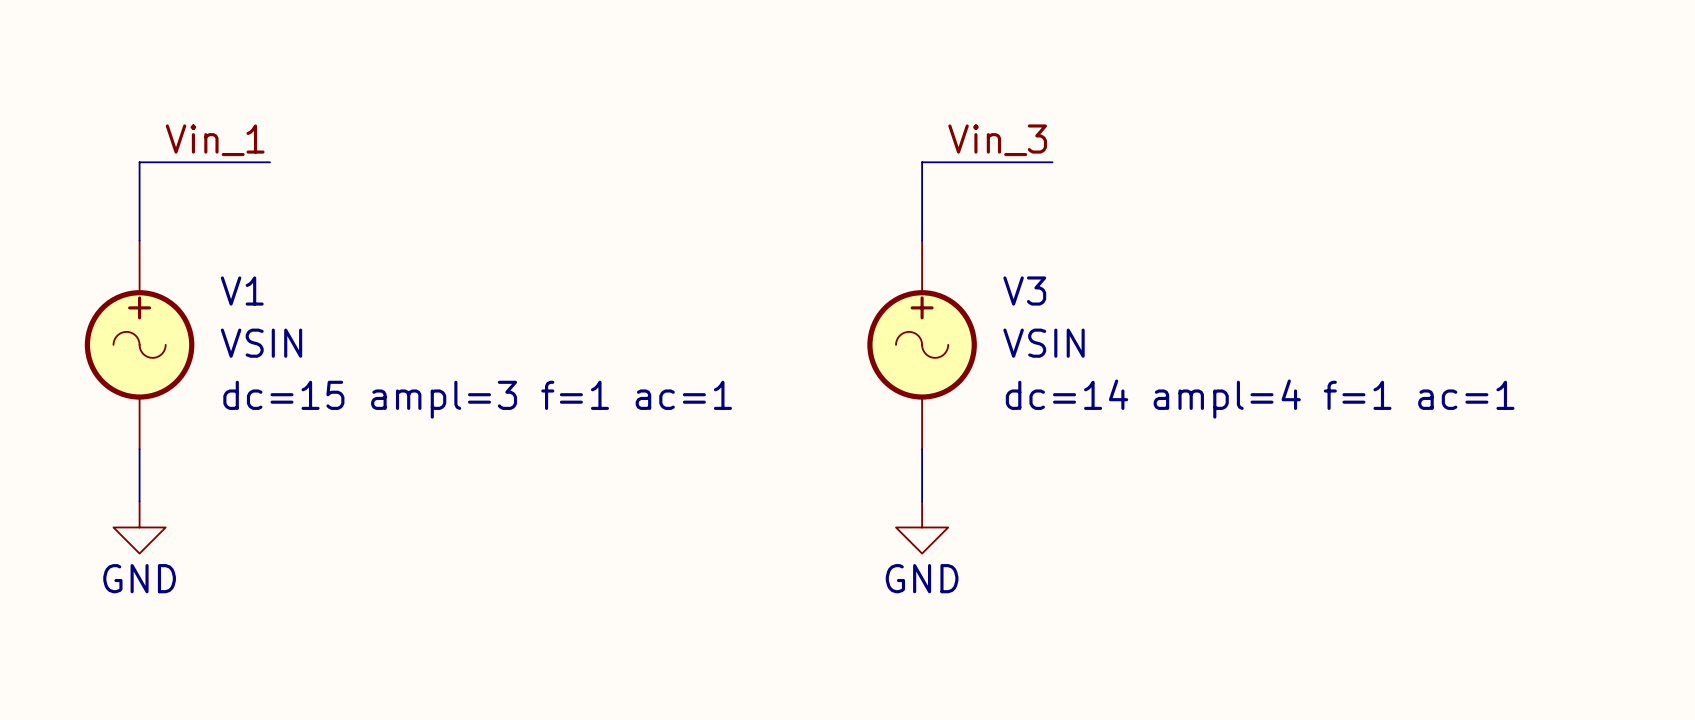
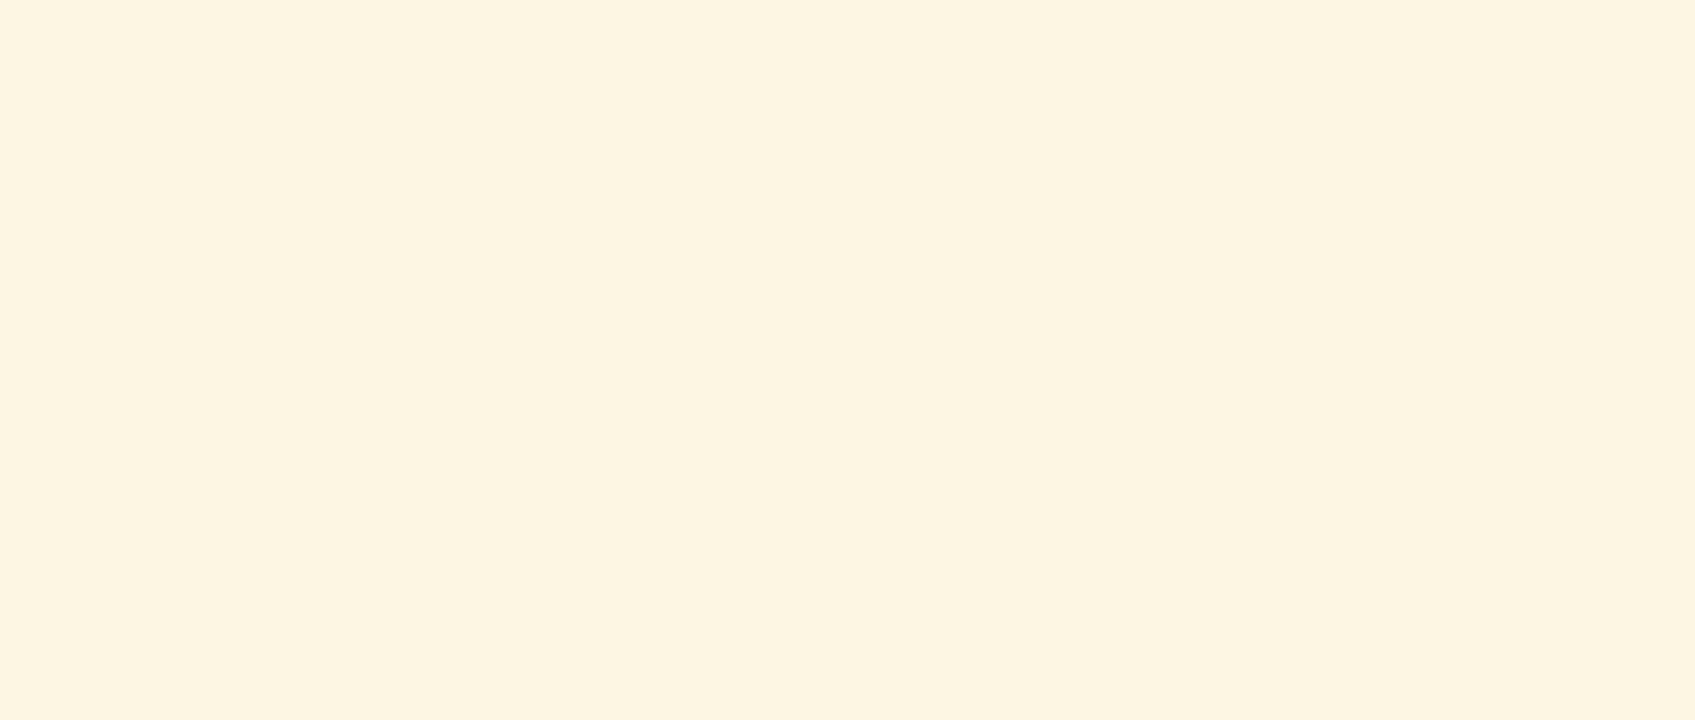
label: Vin_1 (215, 140) -> none
label: Vin_3 (997, 140) -> none
wire: (270, 162) (139, 162) (139, 240) -> none
wire: (1052, 162) (922, 162) (922, 240) -> none
V1: VSIN (139, 344) -> none
V3: VSIN (922, 344) -> none
wire: (139, 449) (139, 501) -> none
wire: (922, 449) (922, 501) -> none
power symbol: GND (139, 527) -> none
power symbol: GND (922, 527) -> none

